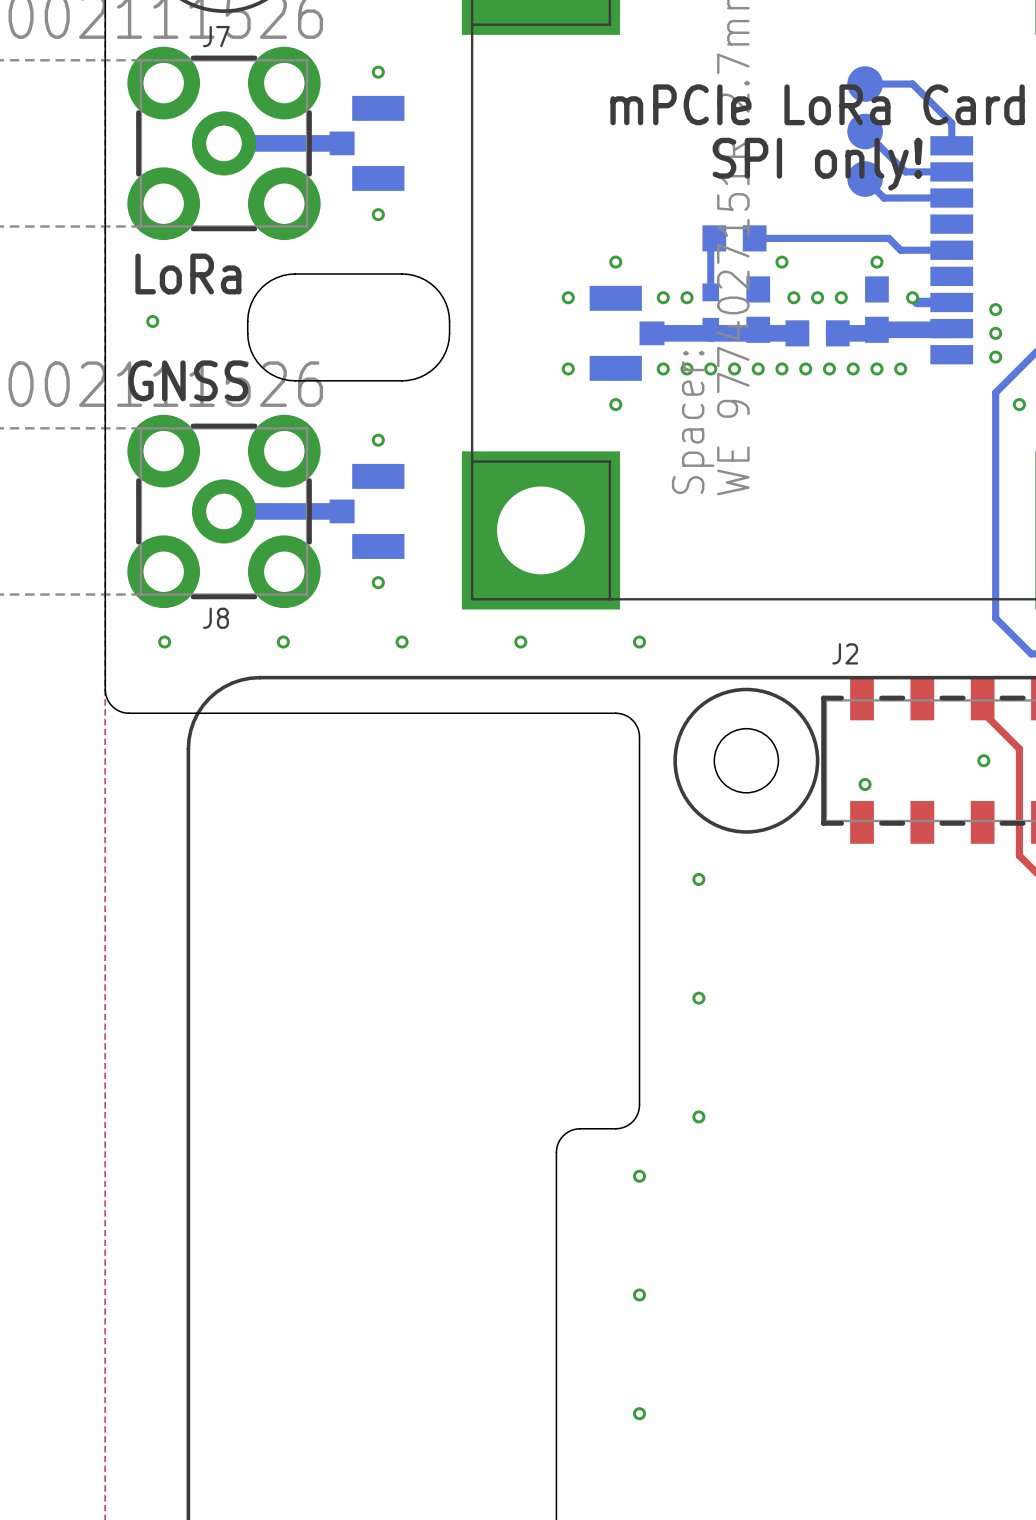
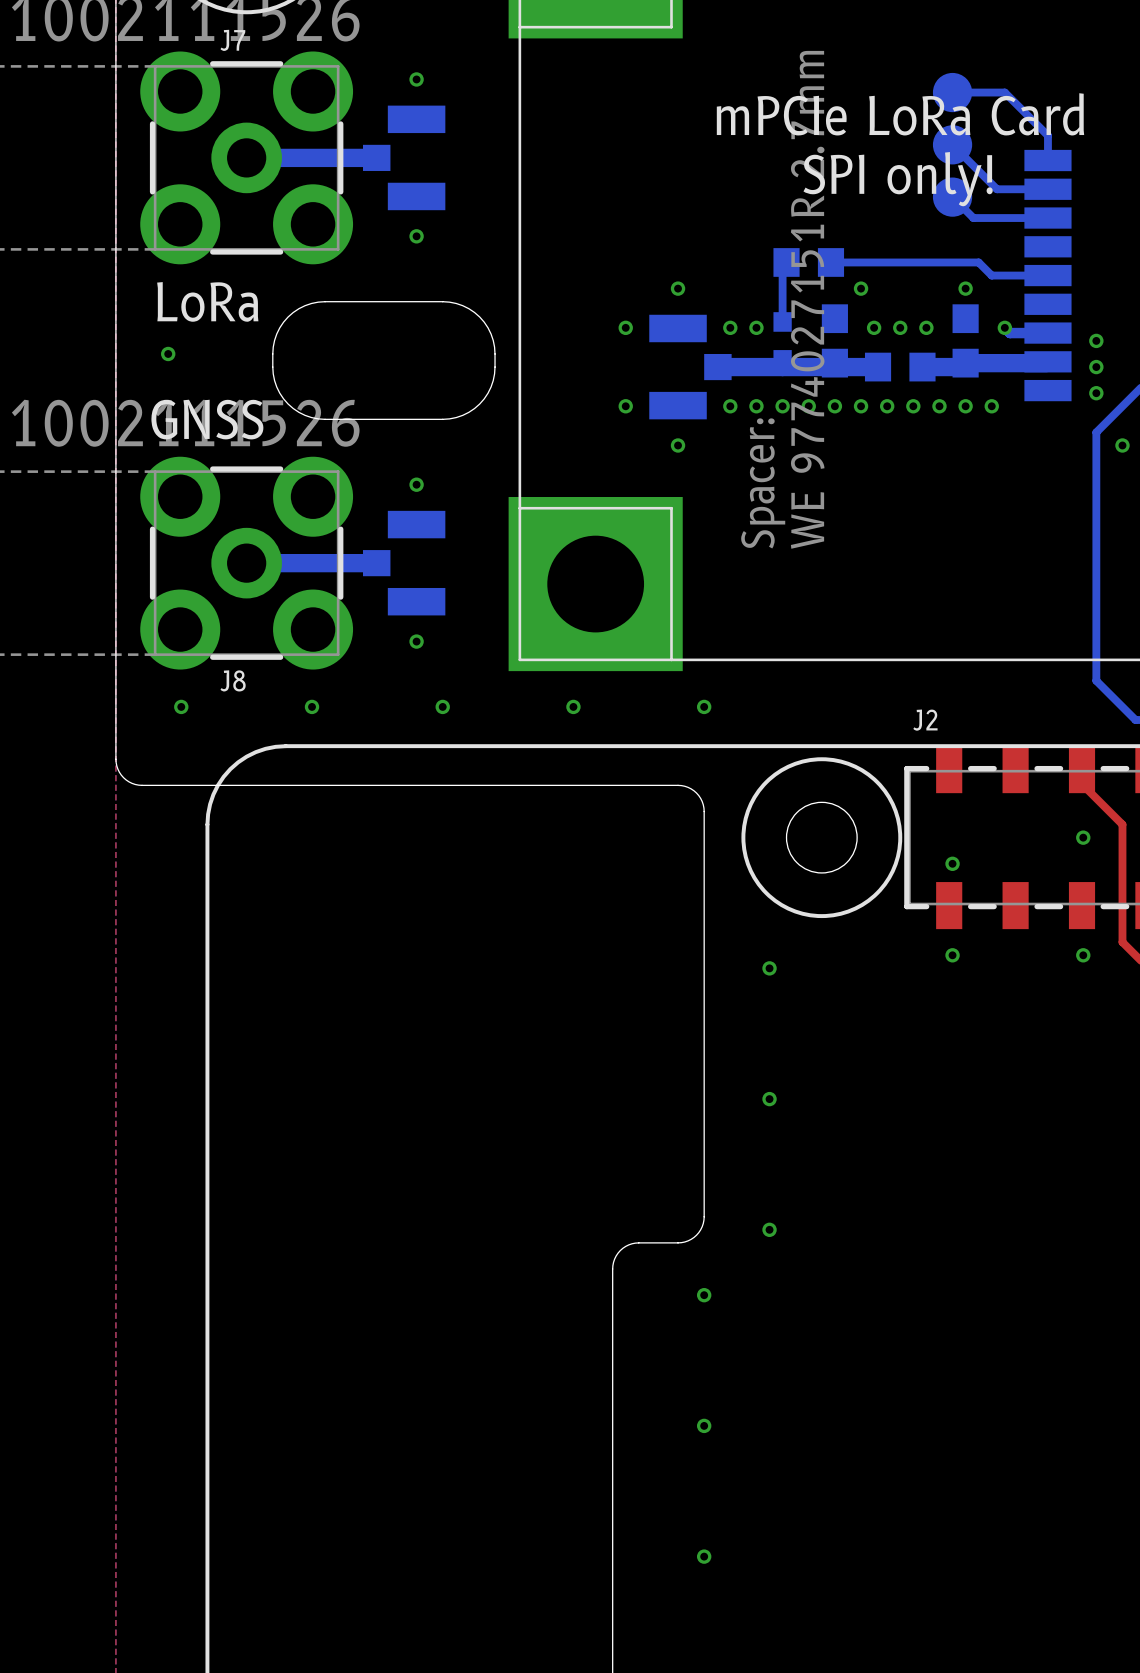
via: none -> (952, 955)
via: none -> (1083, 955)

